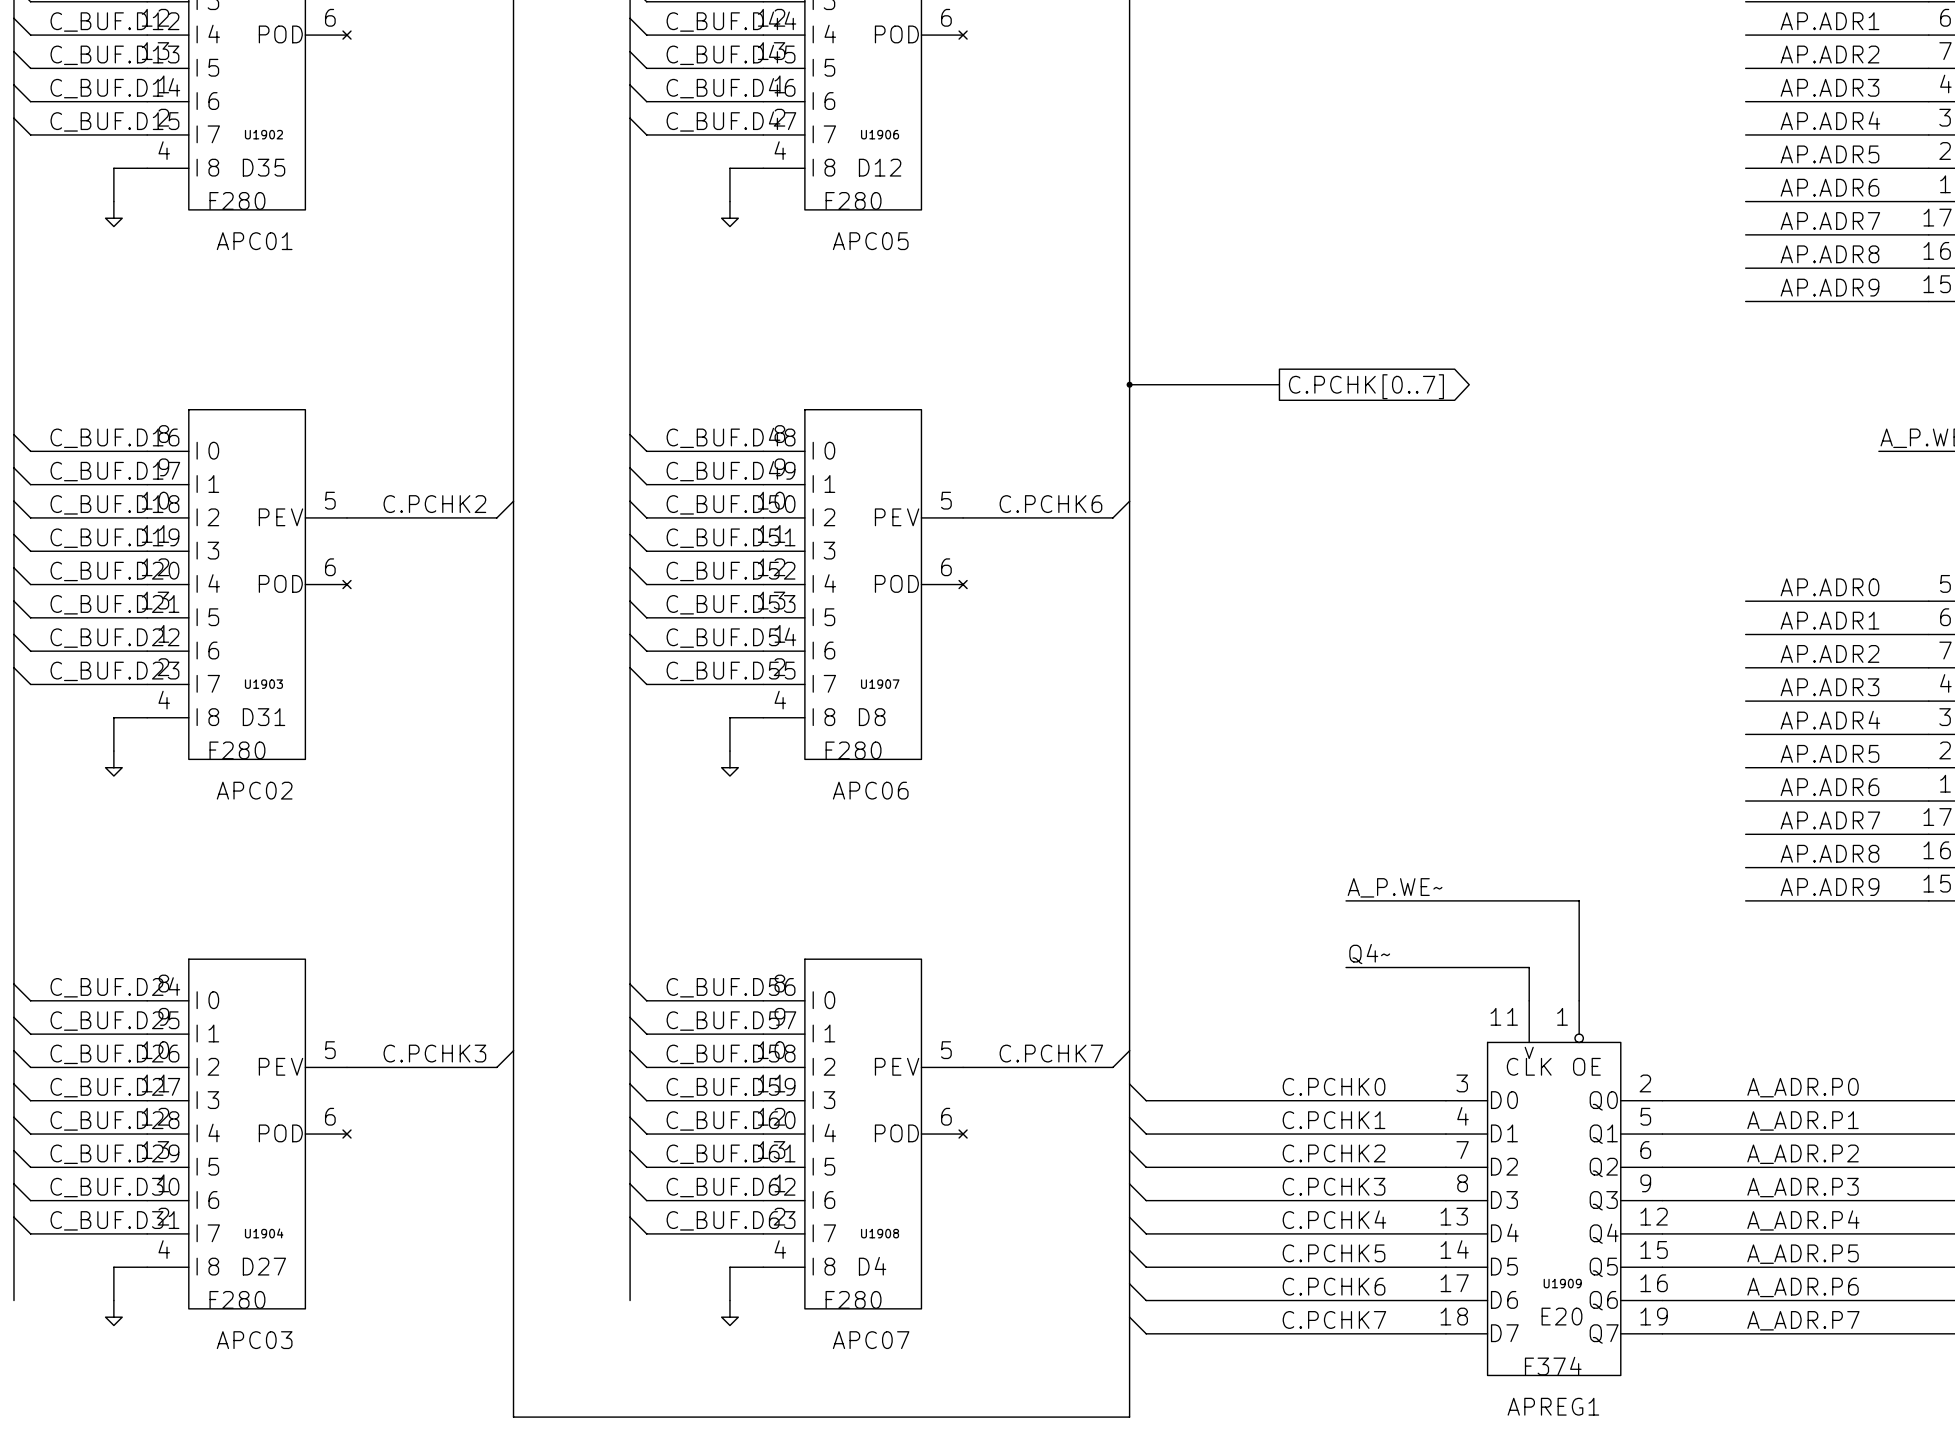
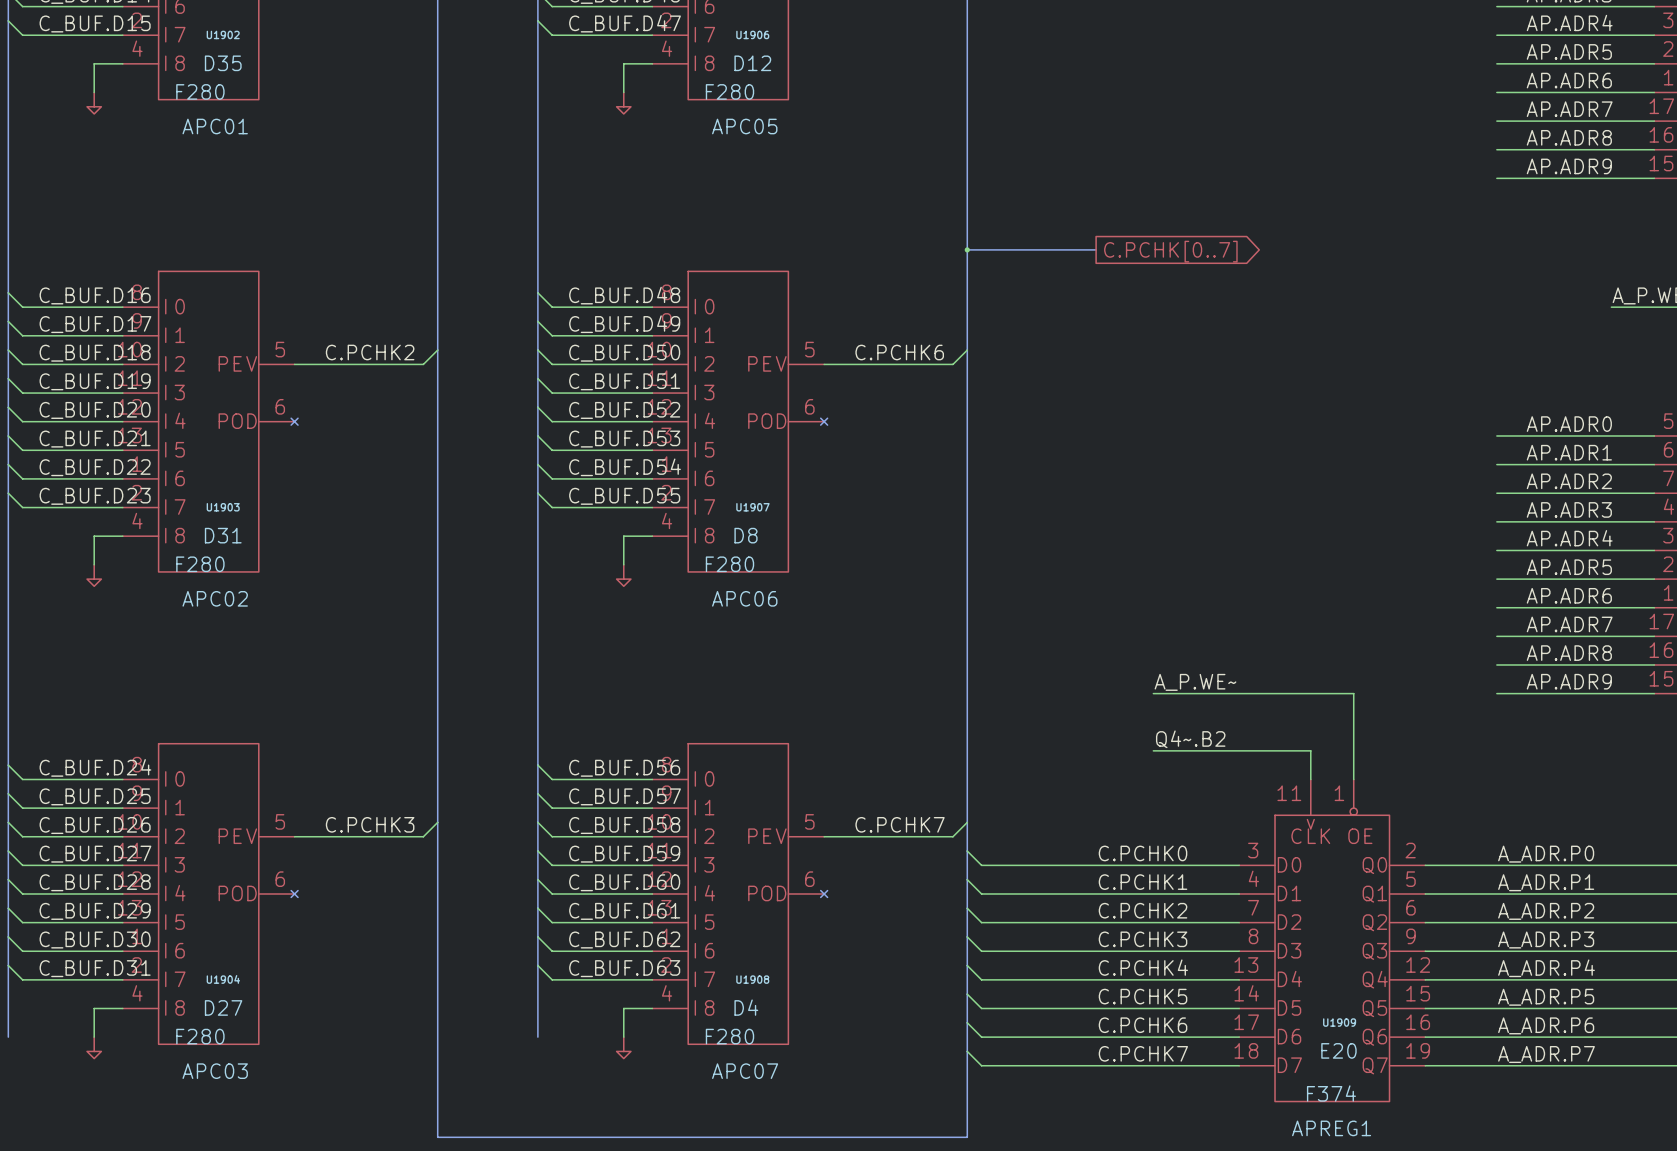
label: Q4~ (1369, 954) -> Q4~.B2 (1190, 739)

